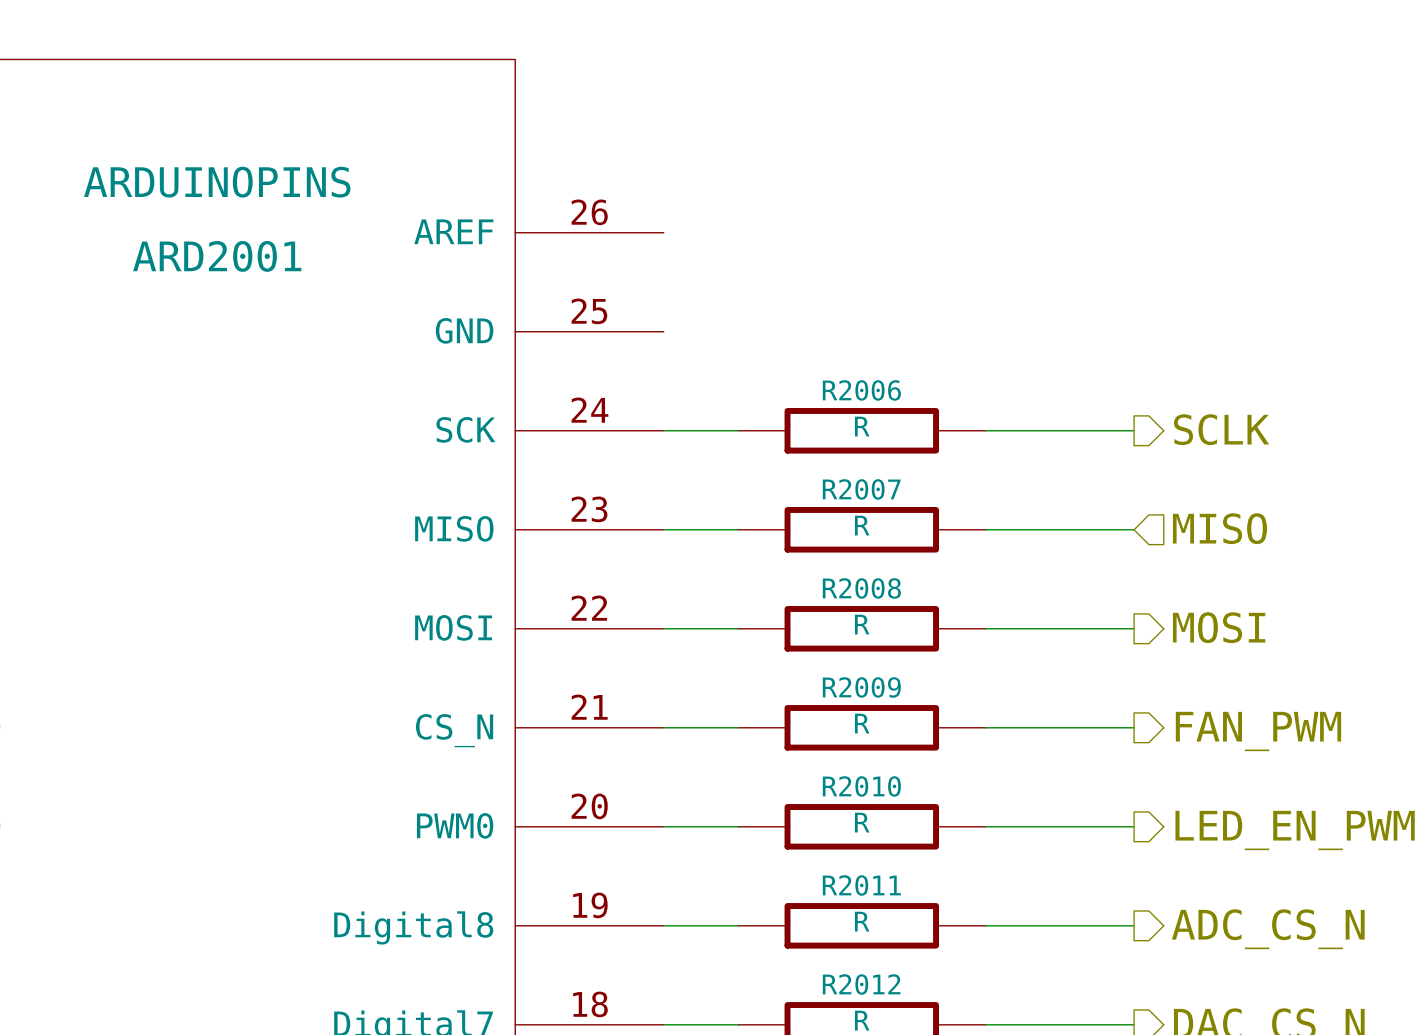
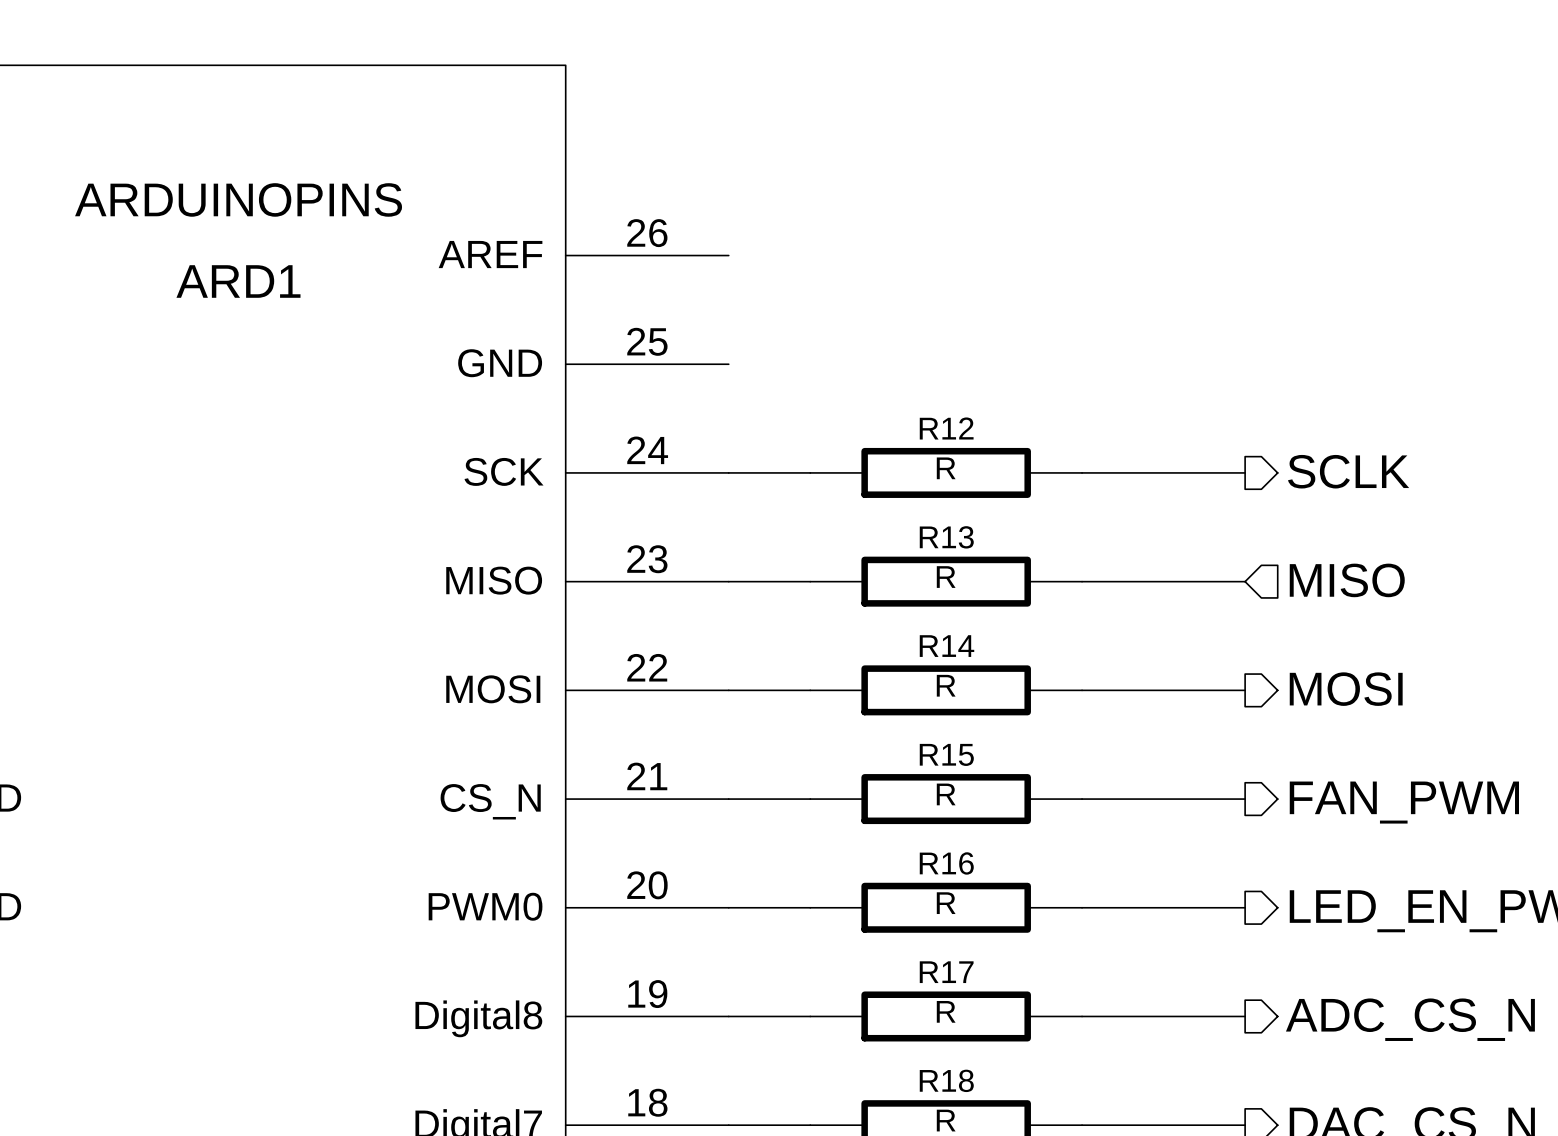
ARD2001 name: ARD2001 (217, 256) -> ARD1 (238, 281)
R2006 name: R2006 (861, 390) -> R12 (946, 428)
R2007 name: R2007 (861, 489) -> R13 (946, 537)
R2008 name: R2008 (861, 588) -> R14 (947, 646)
R2009 name: R2009 (861, 687) -> R15 (946, 754)
R2010 name: R2010 (861, 786) -> R16 (946, 863)
R2011 name: R2011 (861, 885) -> R17 (946, 972)
R2012 name: R2012 (861, 984) -> R18 (946, 1080)

